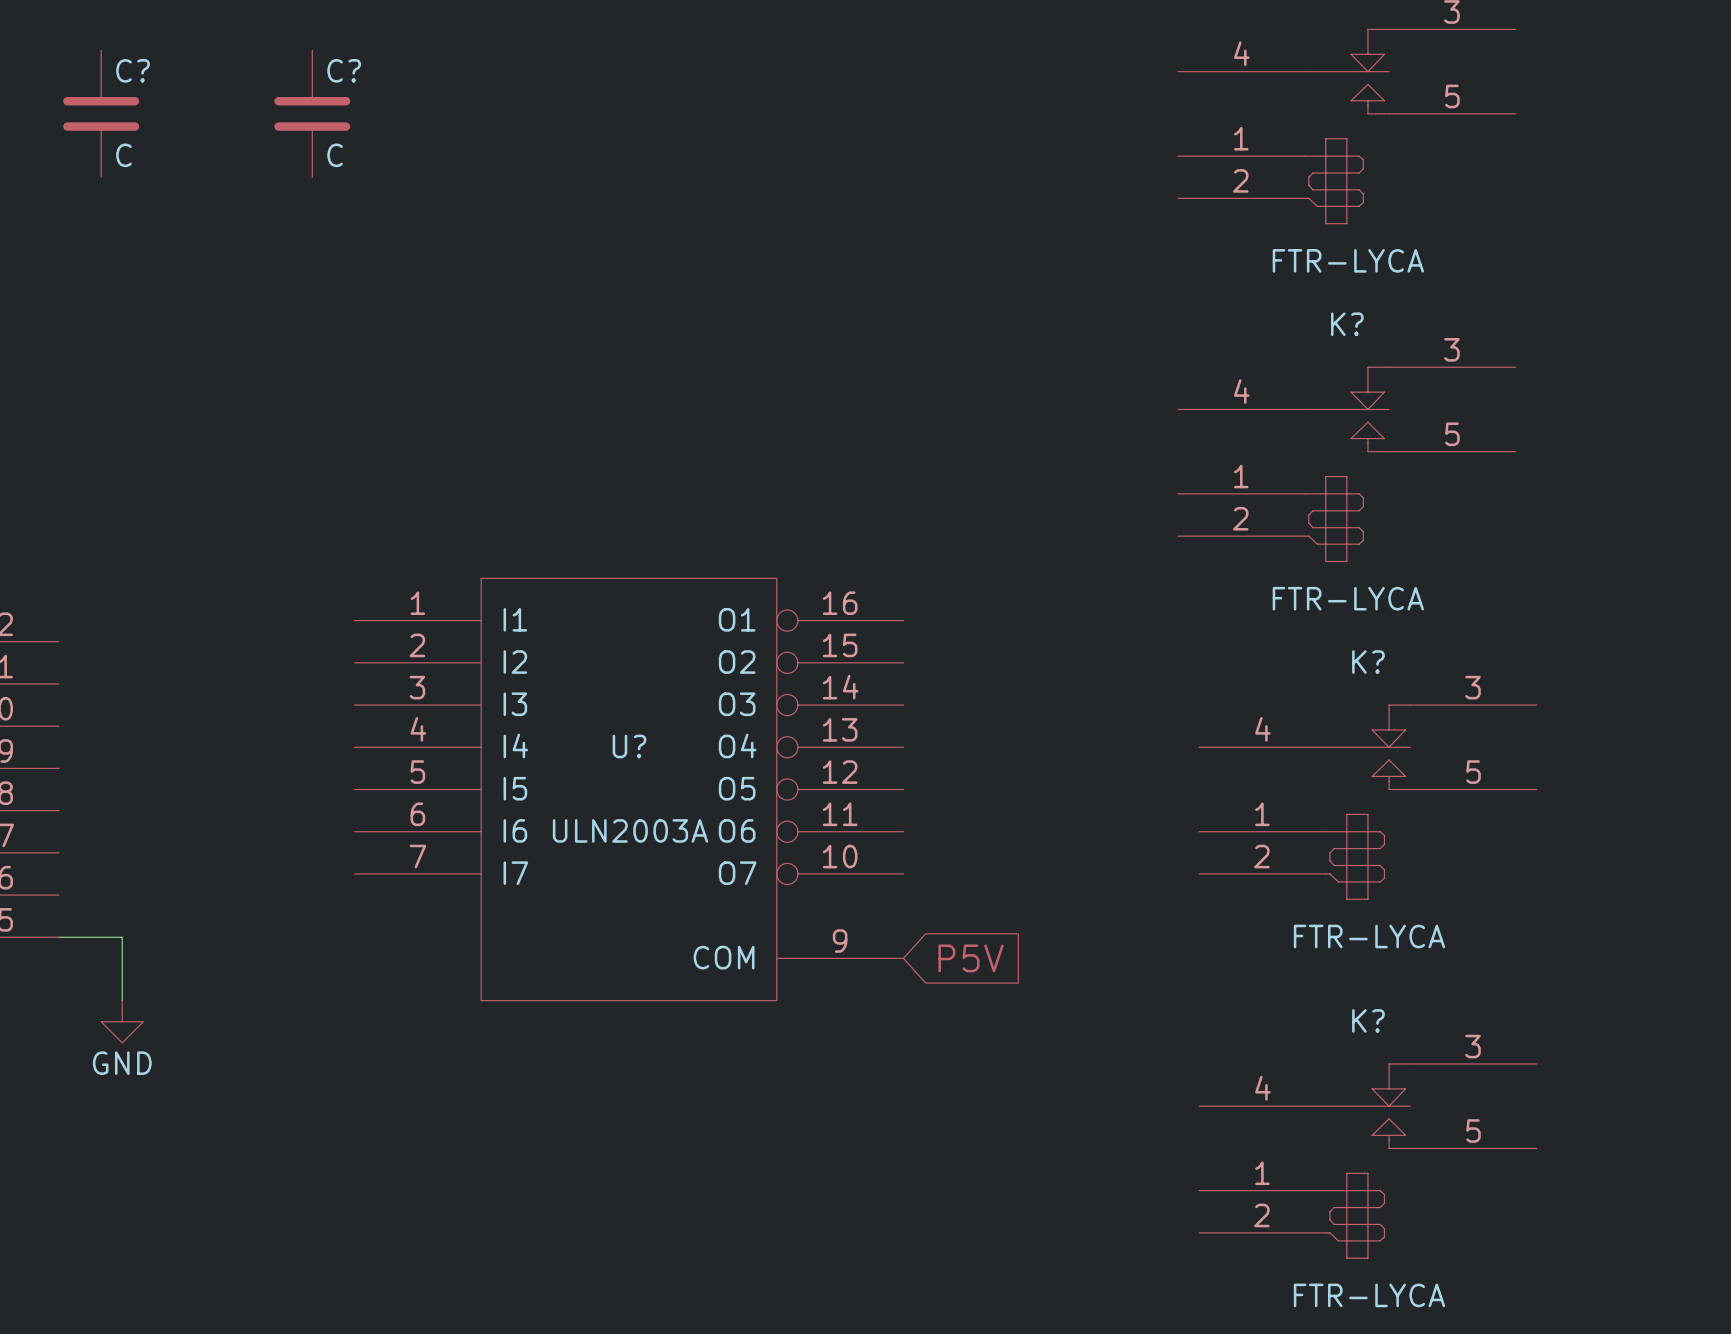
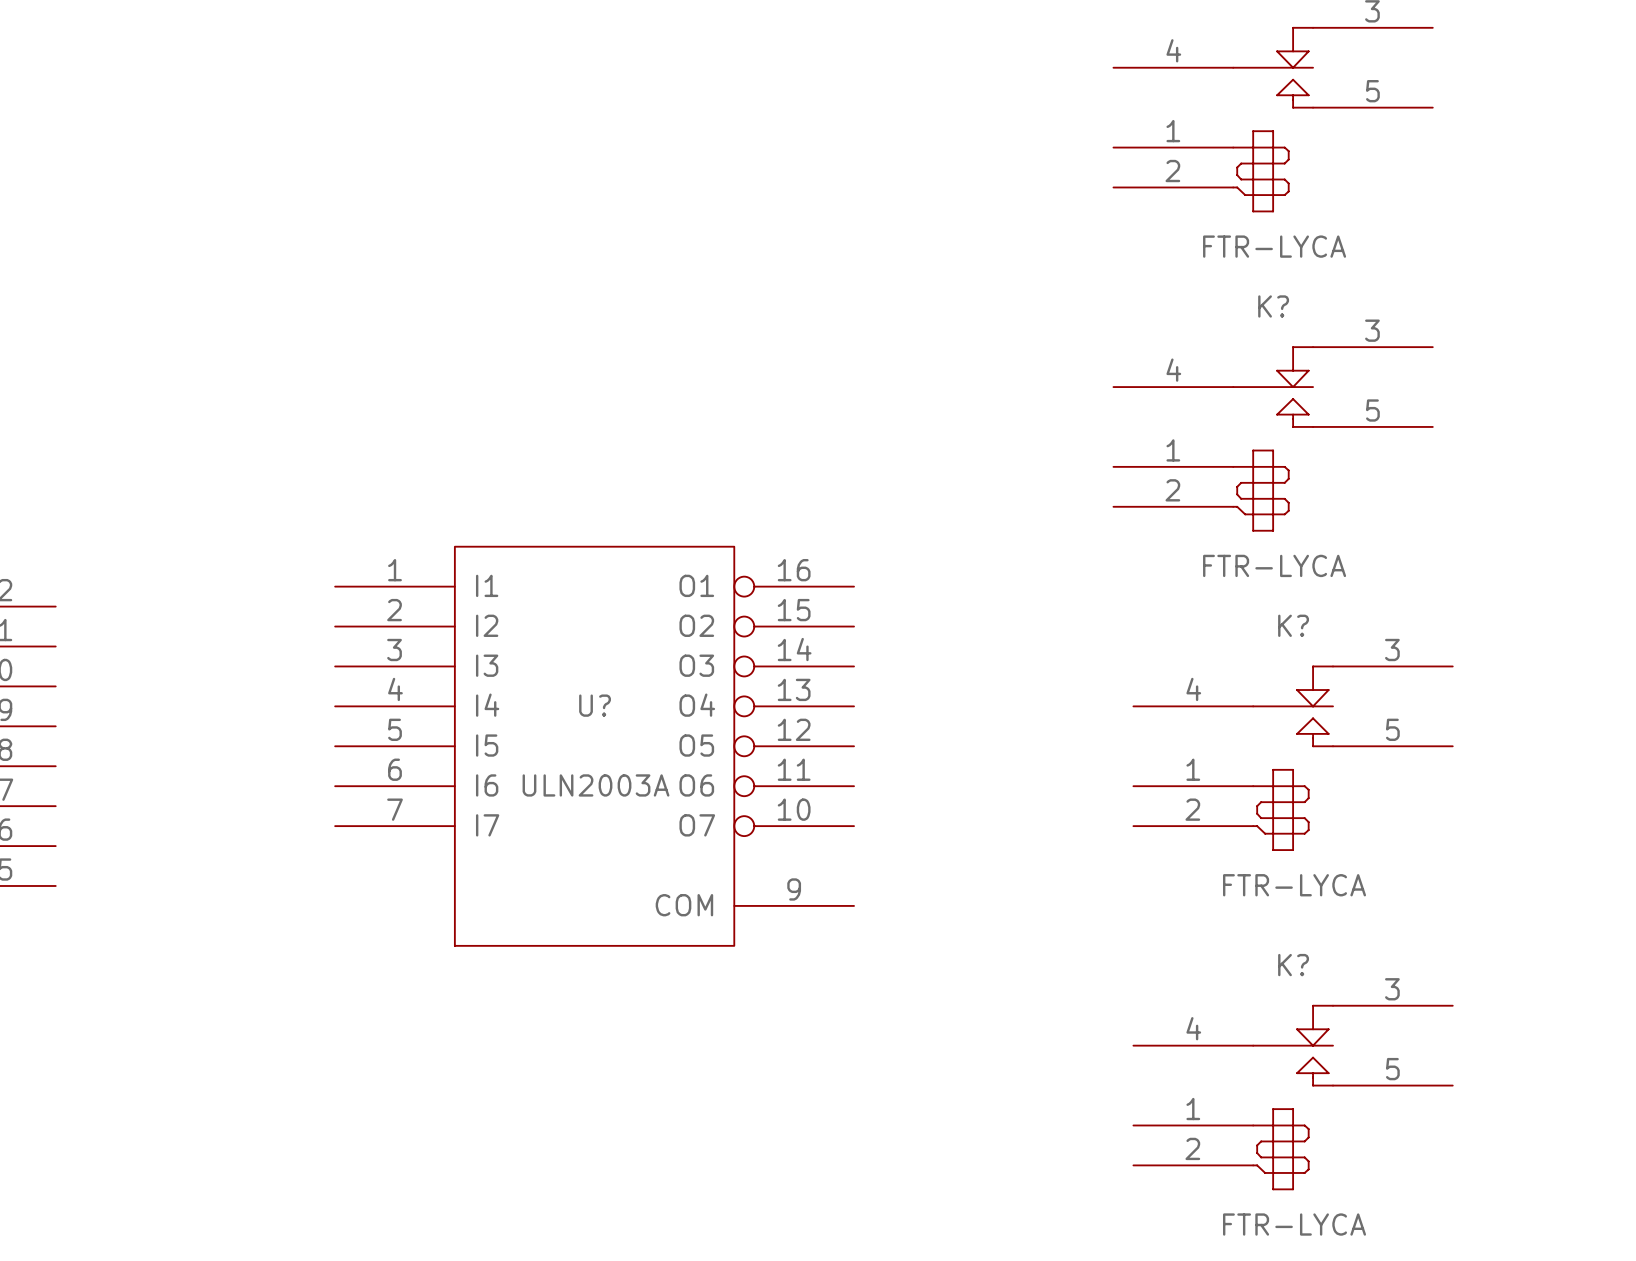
C?: C (101, 113) -> none
C?: C (312, 113) -> none
wire: (58, 937) (122, 937) (122, 1000) -> none
global label: P5V (971, 958) -> none
power symbol: GND (122, 1021) -> none

